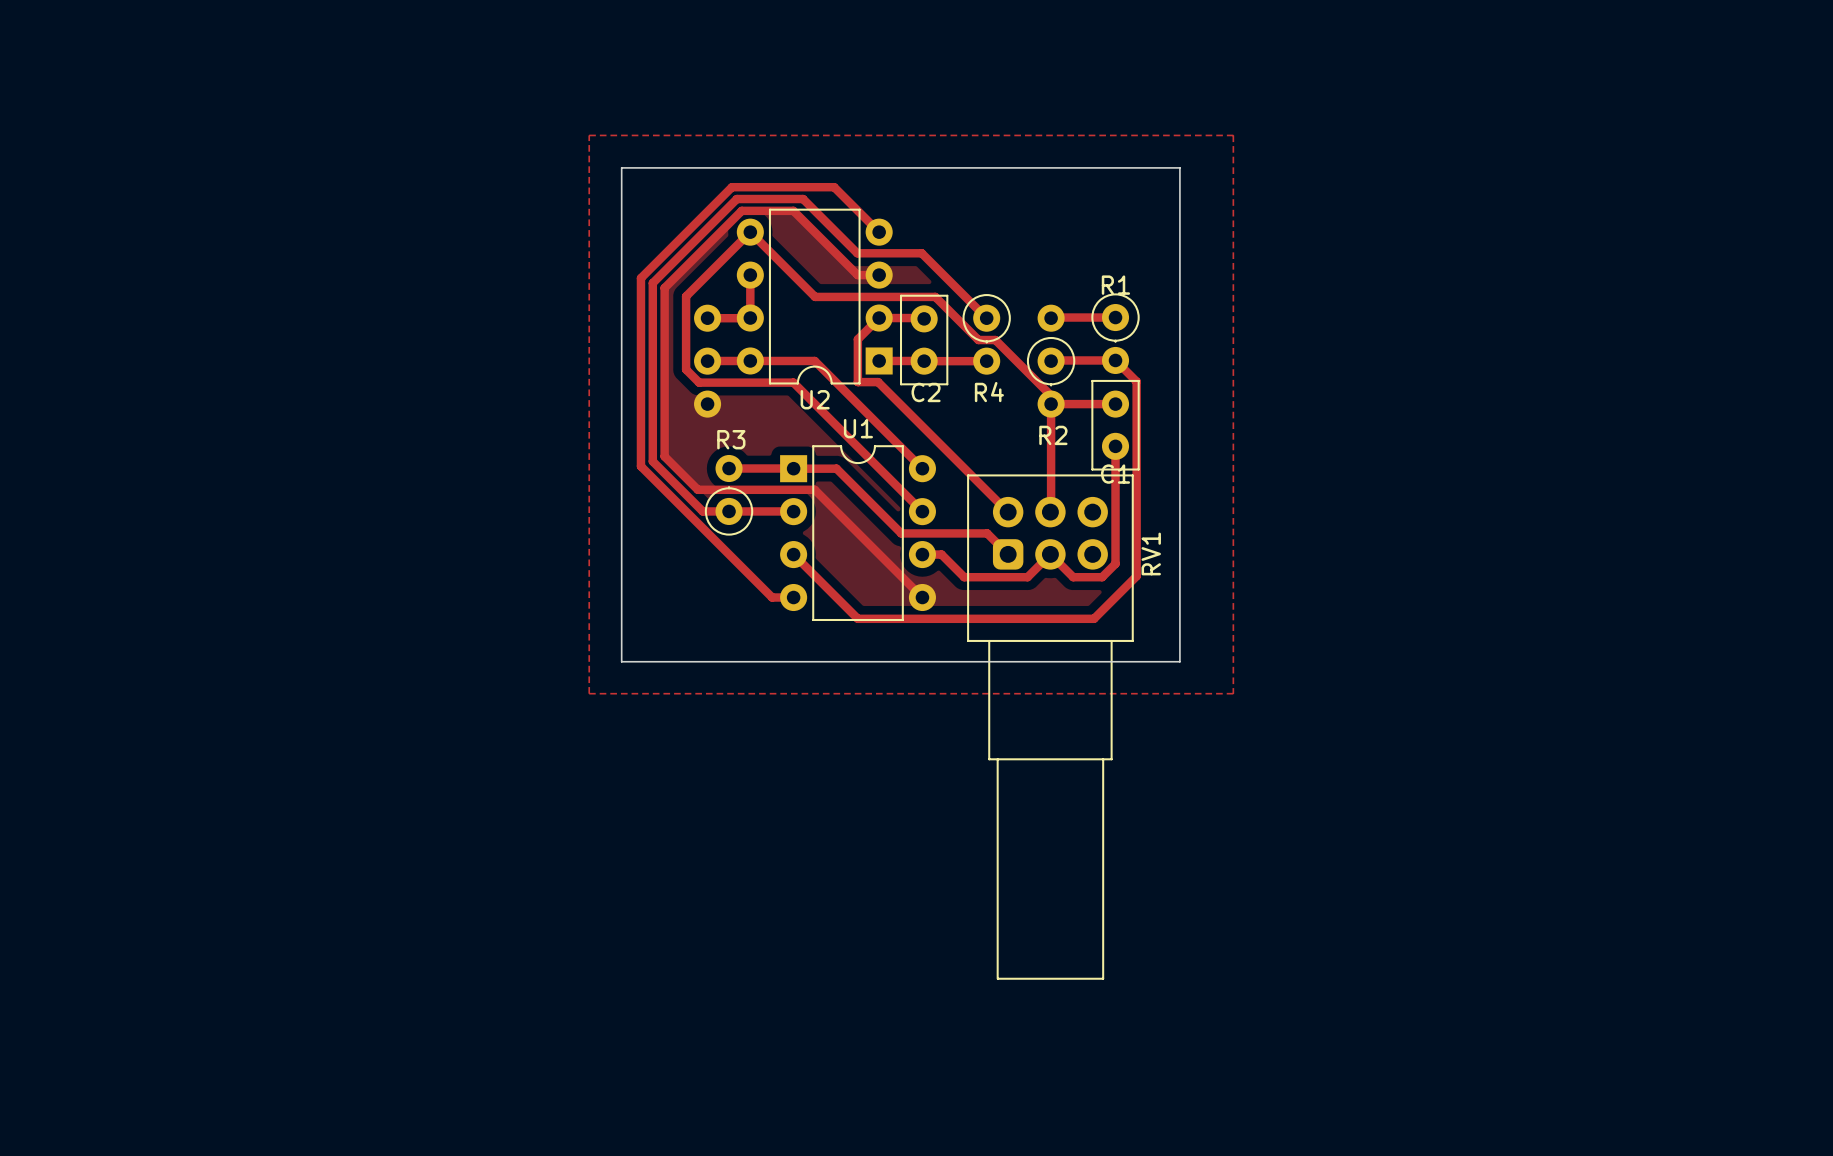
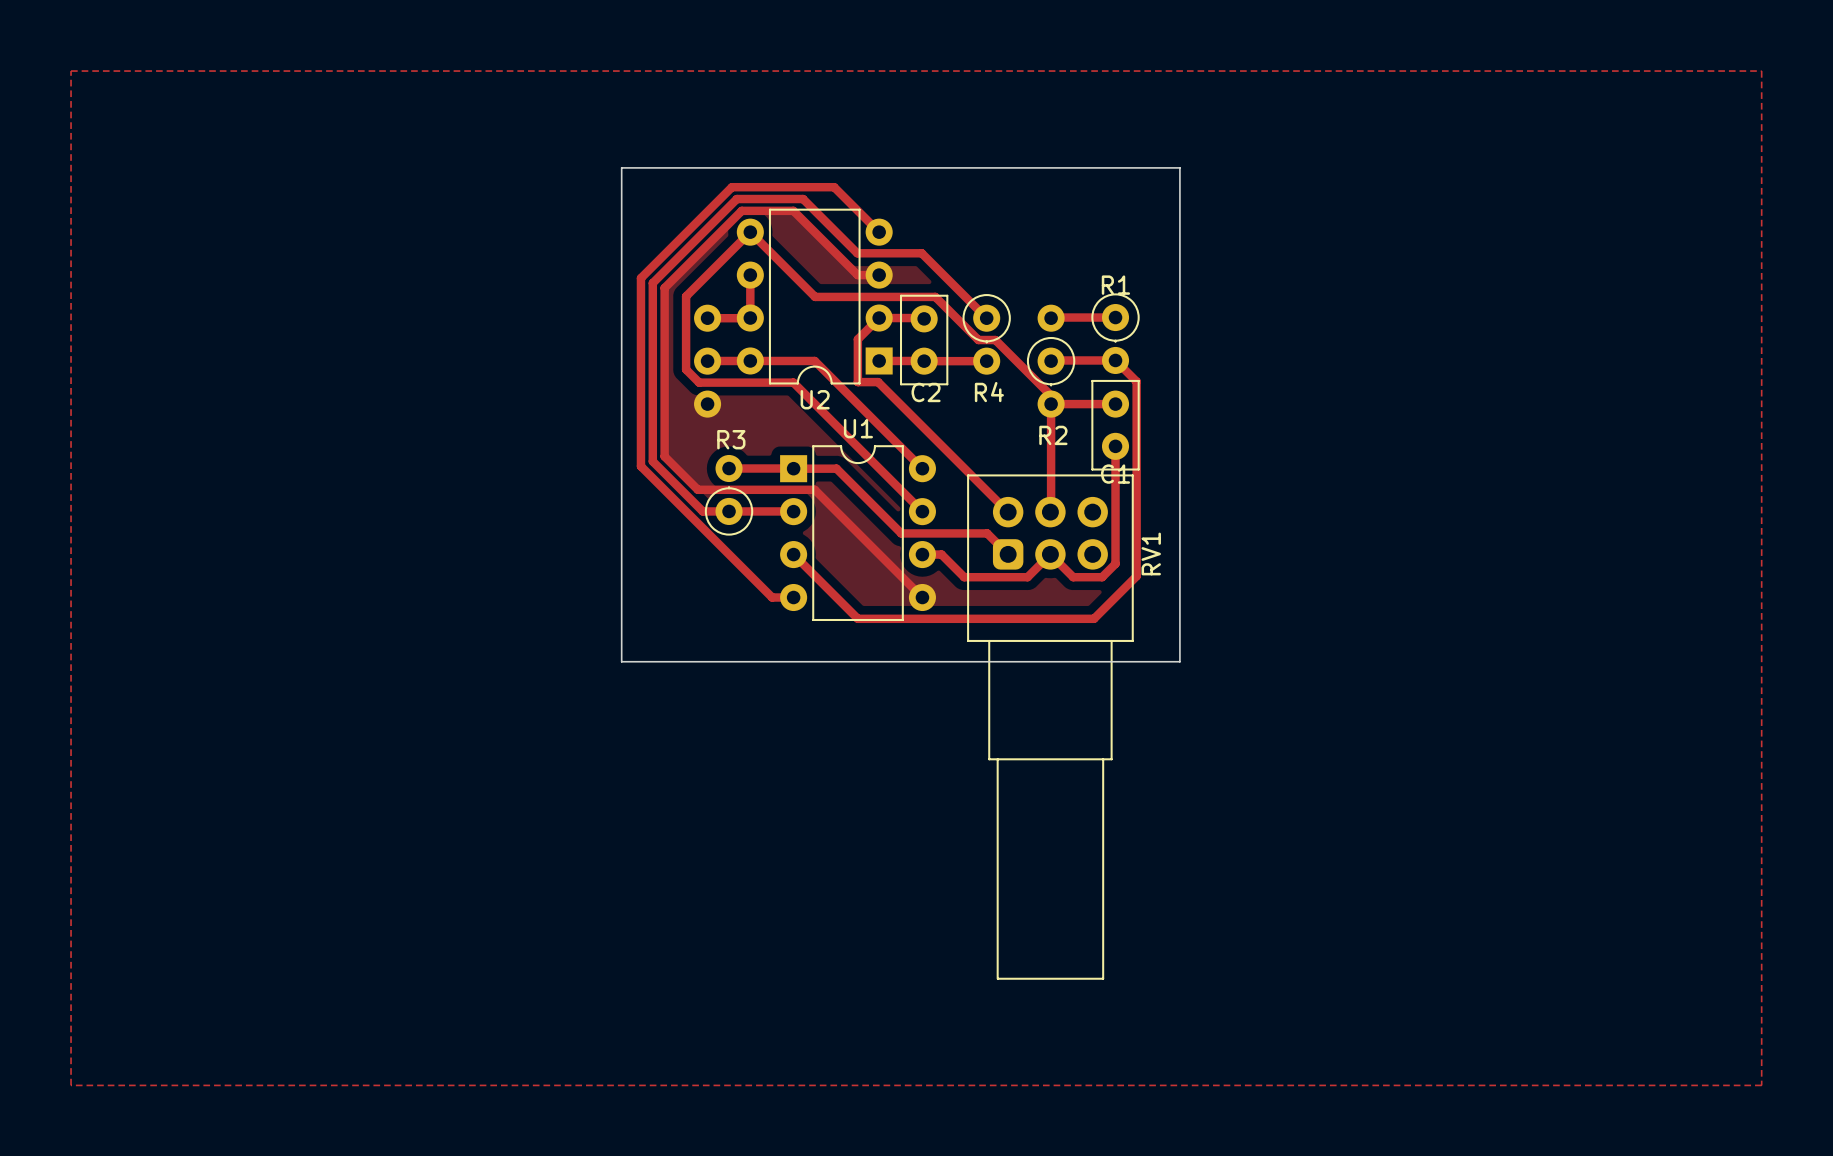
zone outline: none -> (71, 71) (1761, 71) (1761, 1085) (71, 1085) (71, 71)
zone outline: (589, 135) (1233, 135) (1233, 693) (589, 693) (589, 135) -> none

